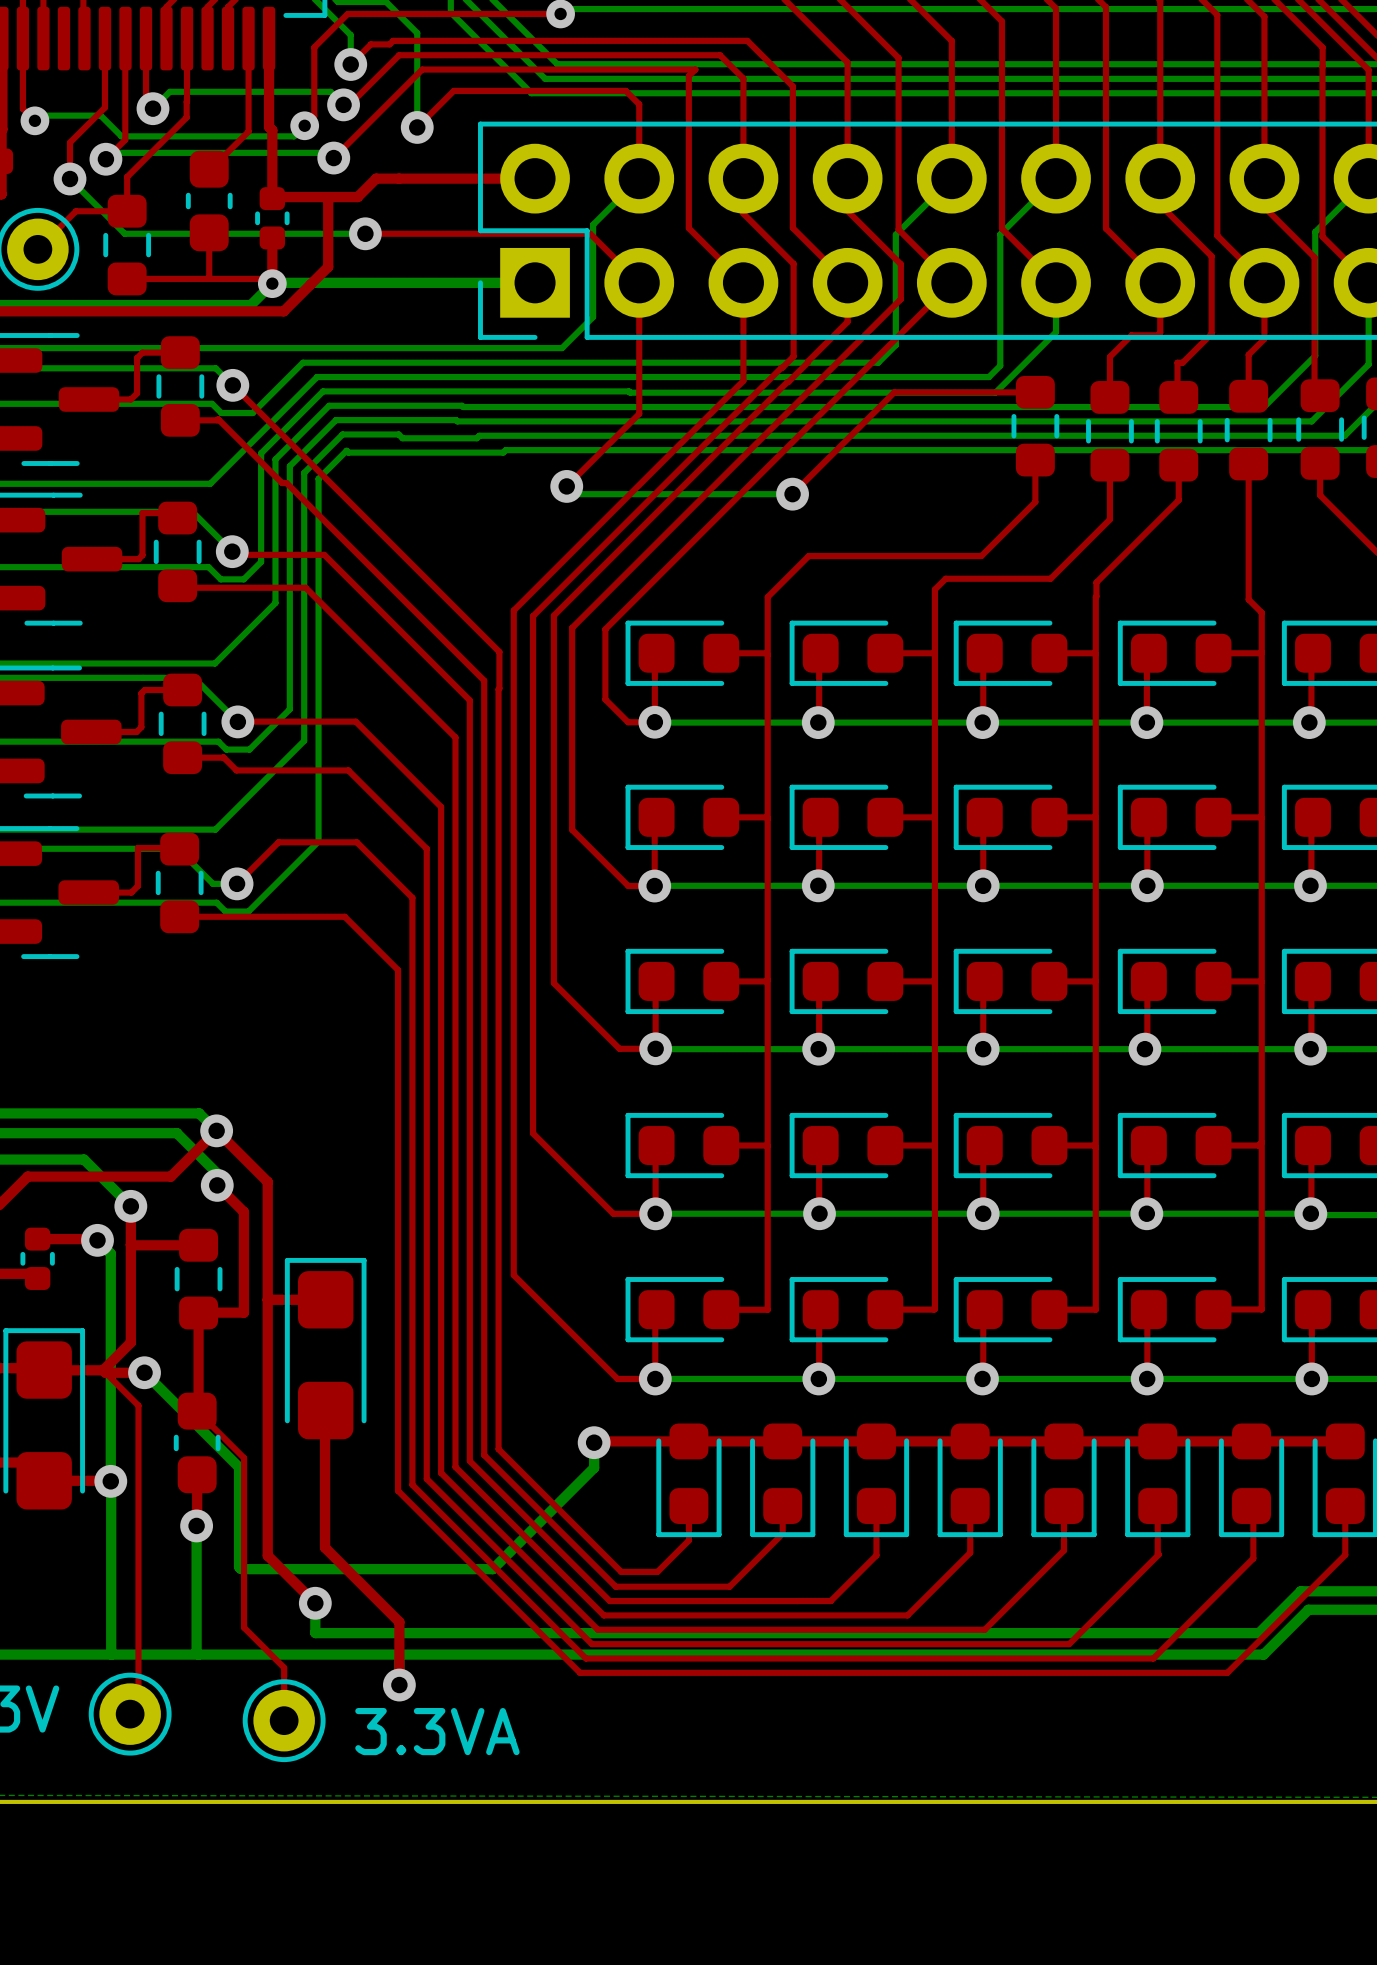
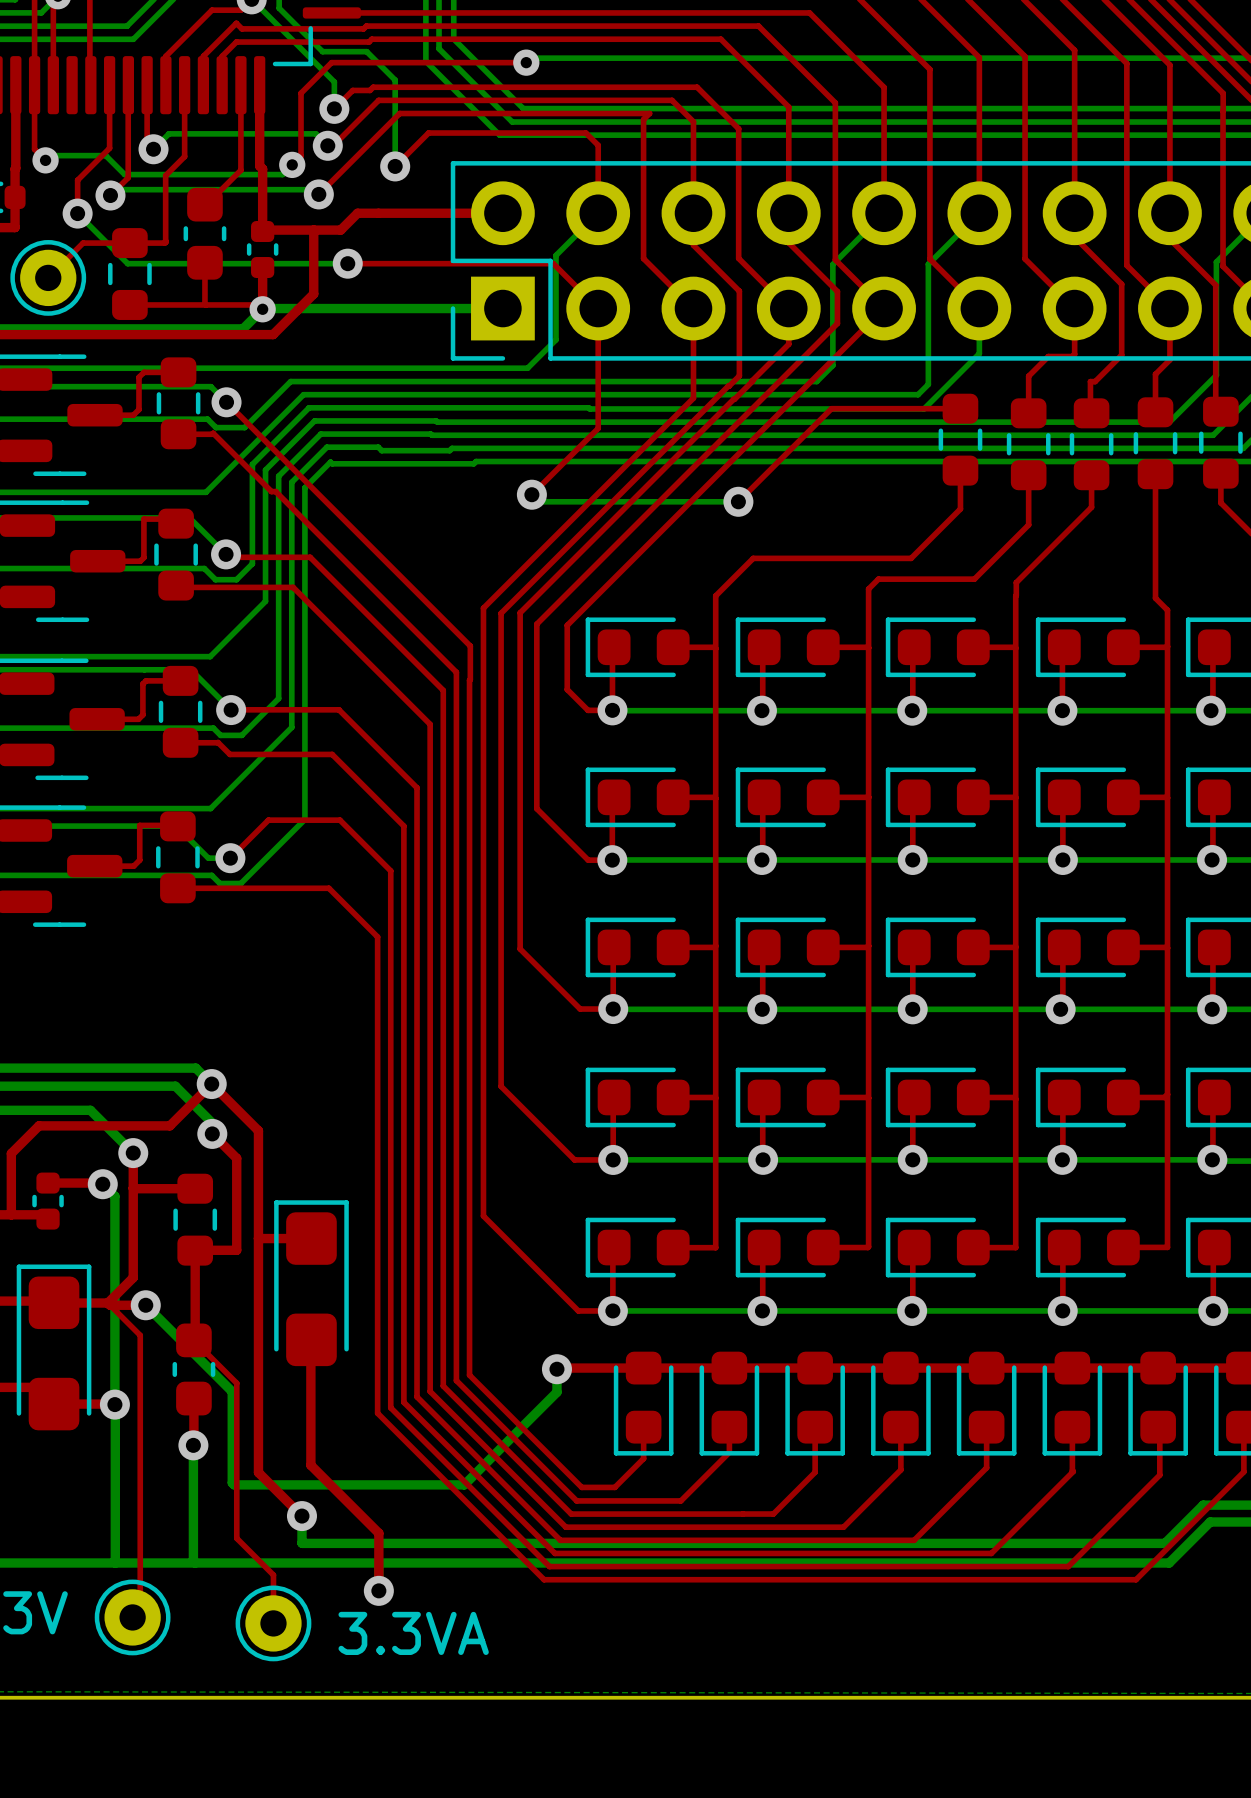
top track: (186, 101) (186, 117) (127, 176) (127, 211) -> (184, 142) (184, 156) (165, 175) (166, 241) (129, 243)

